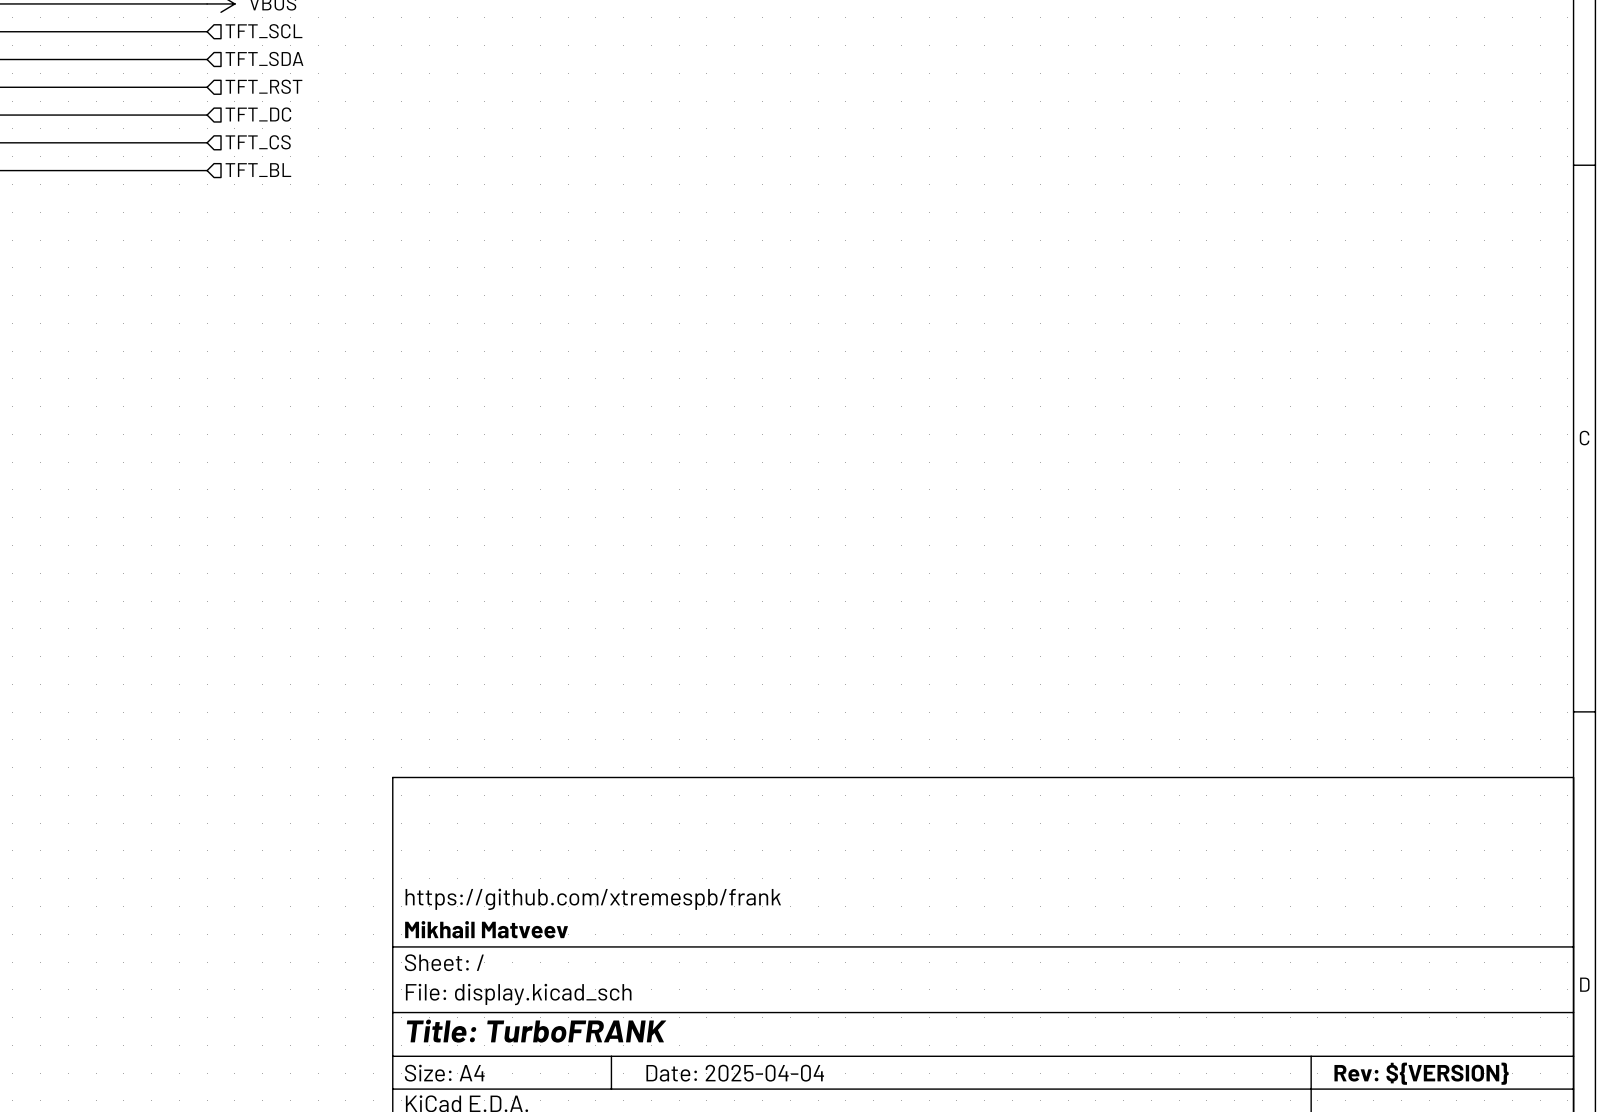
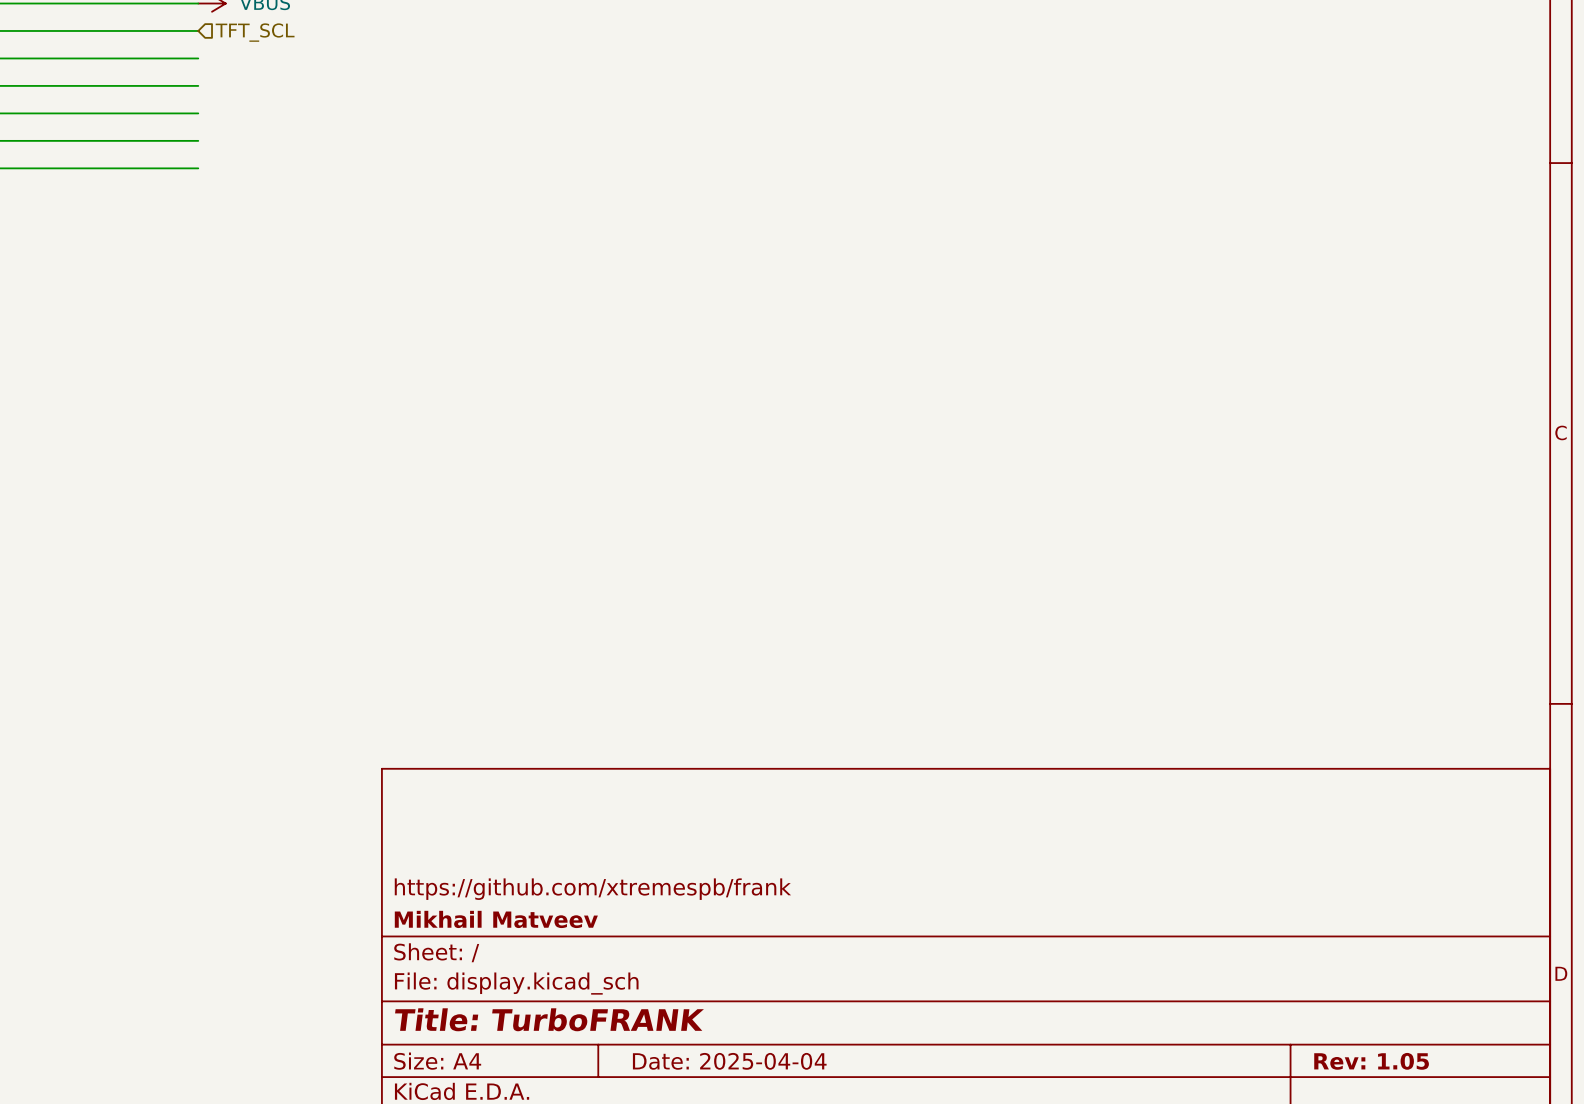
hierarchical label: TFT_SDA (264, 58) -> none
hierarchical label: TFT_RST (263, 86) -> none
hierarchical label: TFT_DC (258, 114) -> none
hierarchical label: TFT_CS (258, 142) -> none
hierarchical label: TFT_BL (258, 170) -> none
title block: Rev: ${VERSION} (1421, 1073) -> Rev: 1.05 (1371, 1061)

